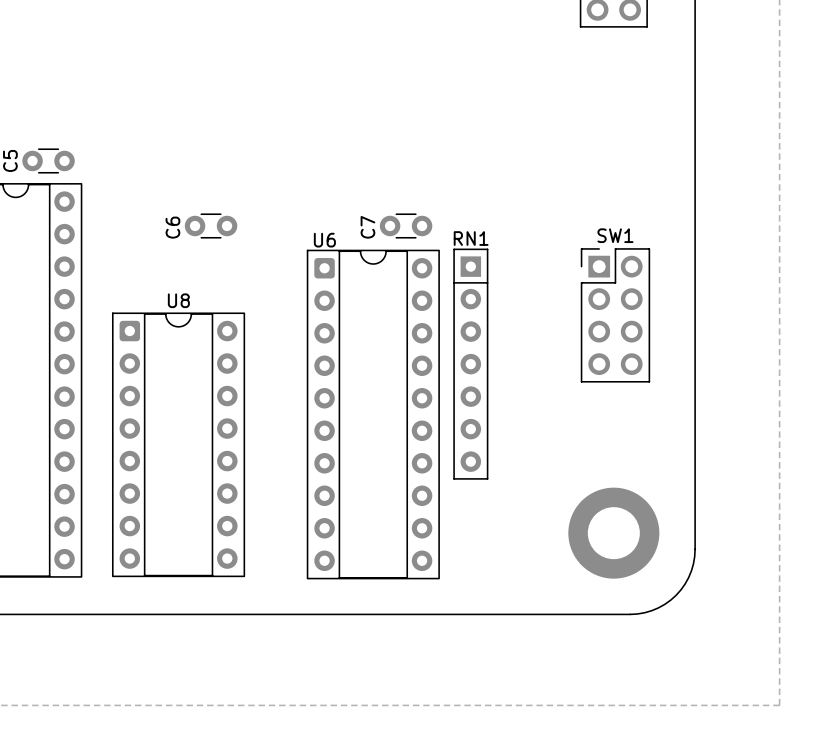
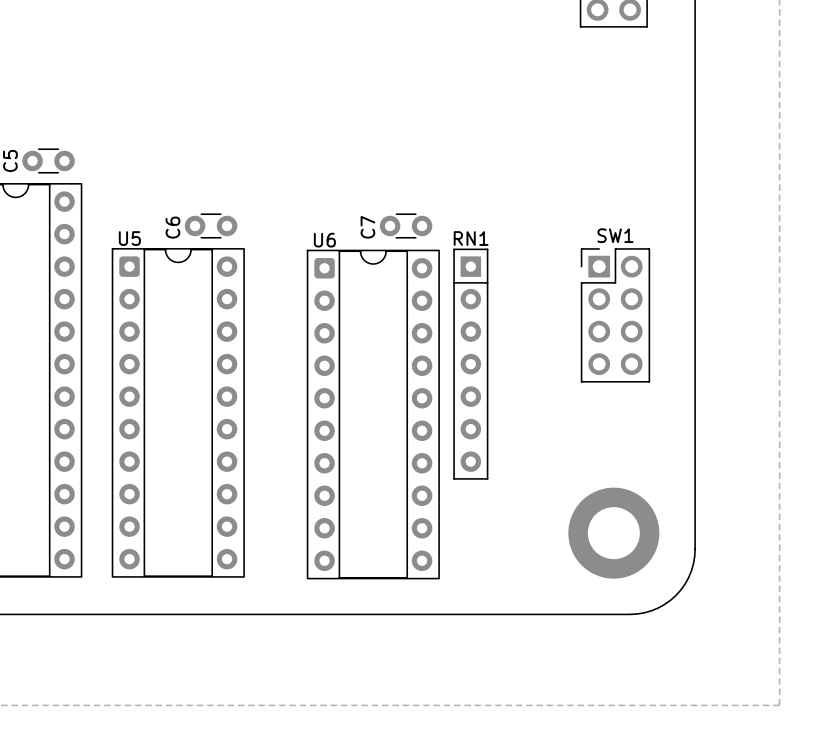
U5: none -> (178, 412)
U8: (178, 444) -> none

